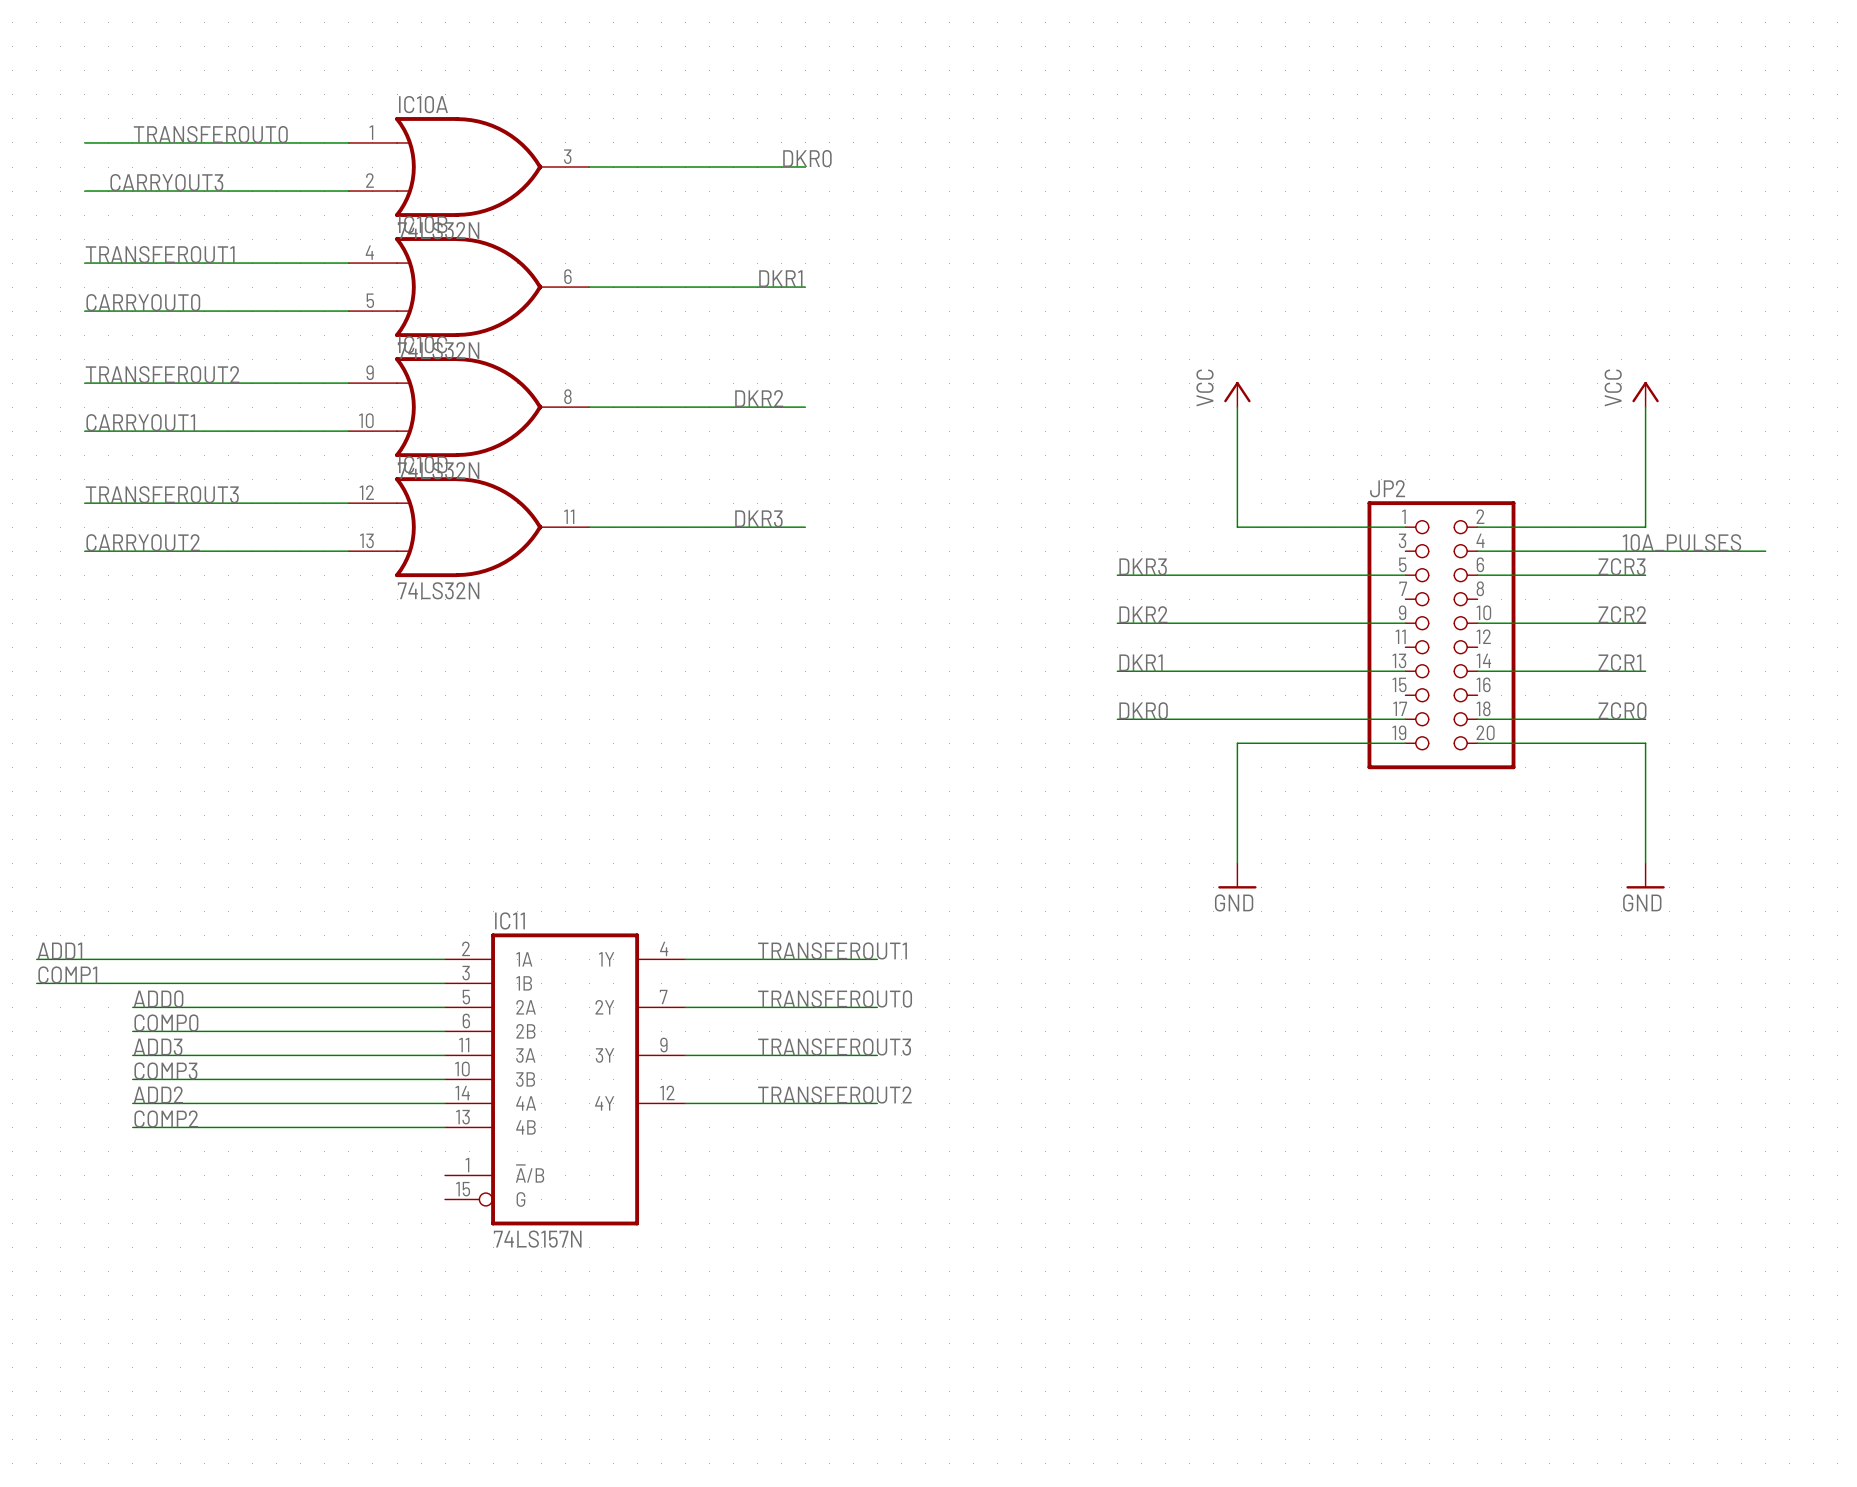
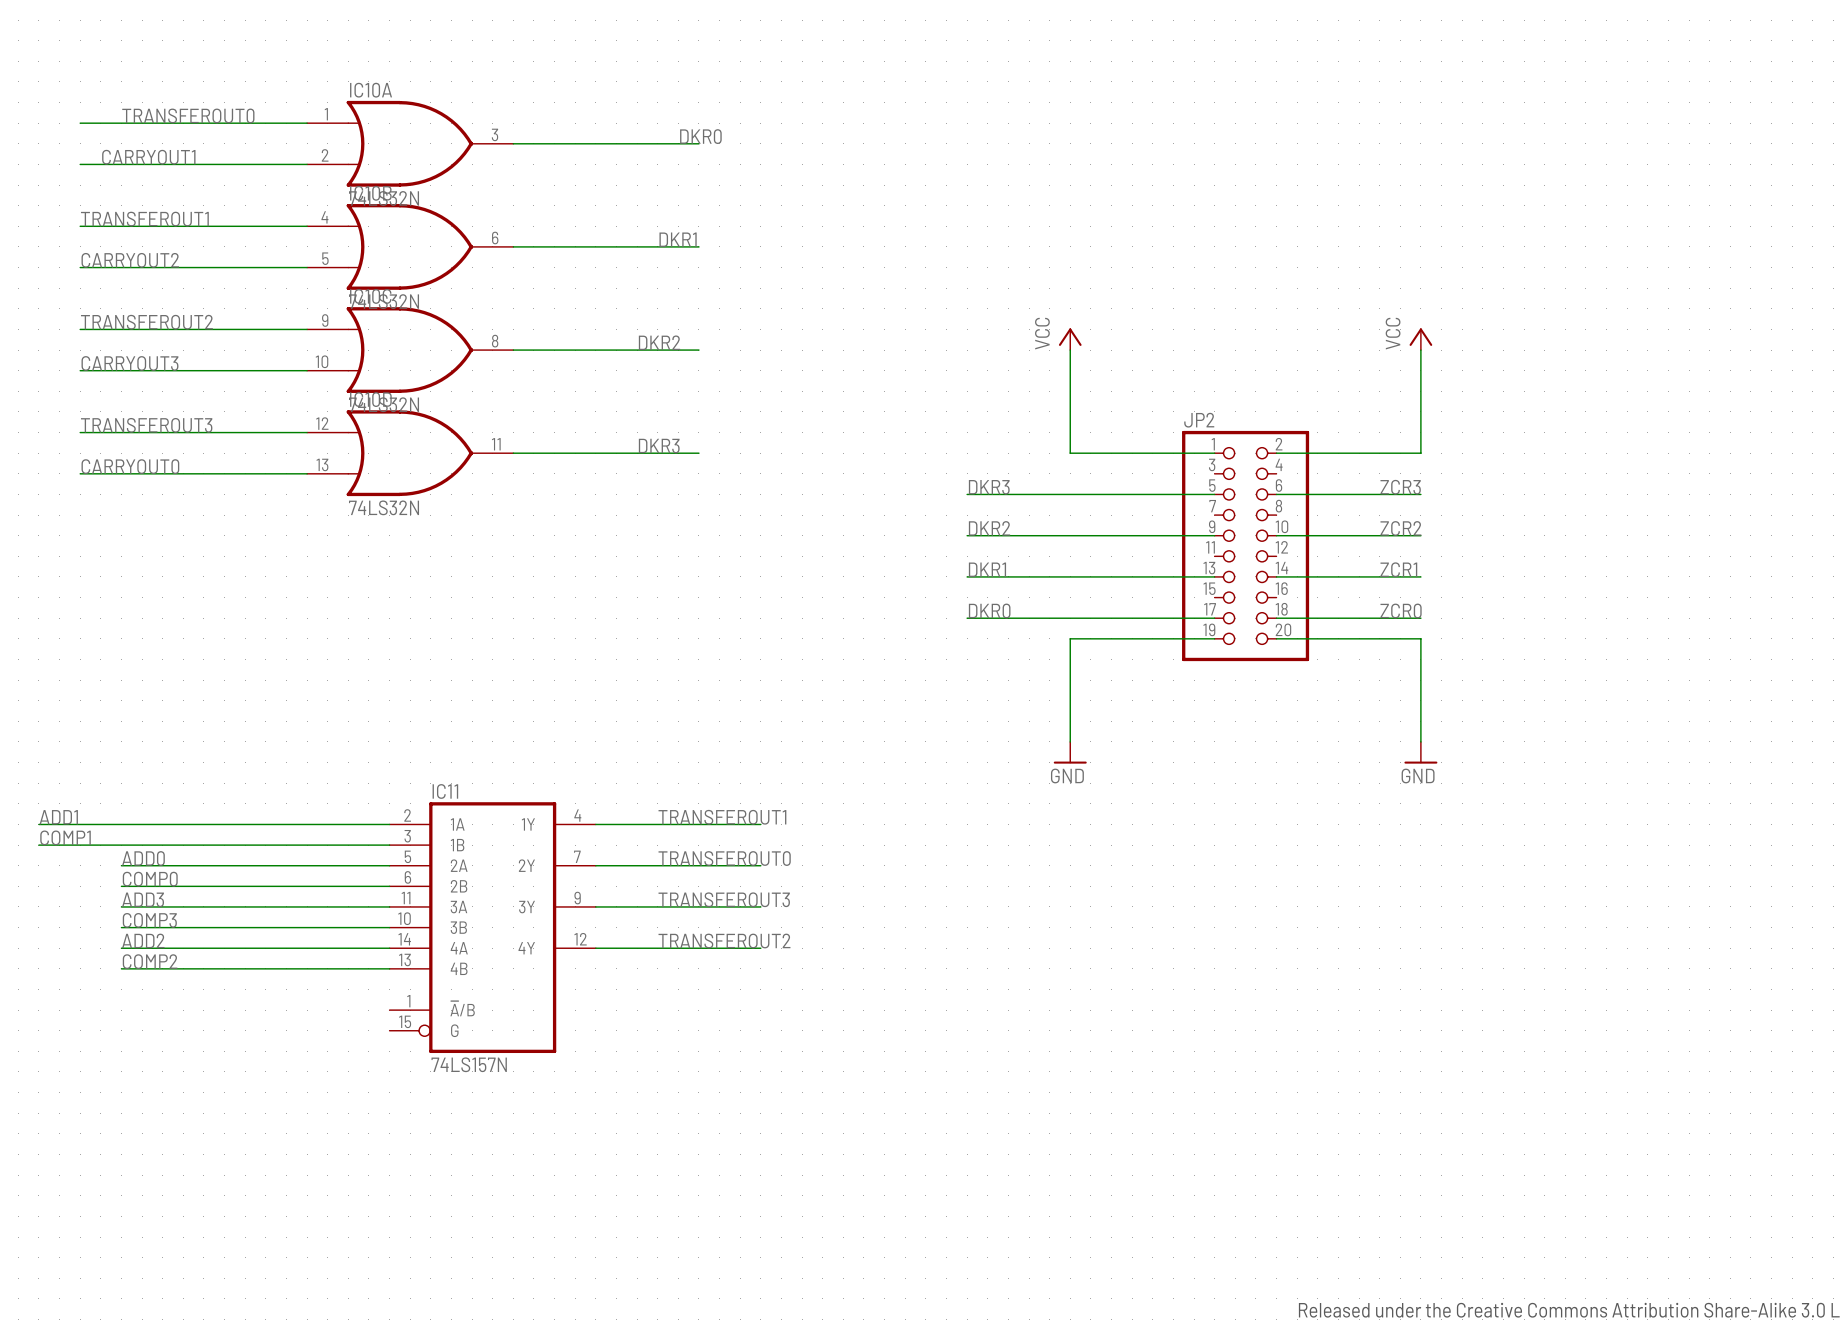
label: CARRYOUT3 (166, 182) -> CARRYOUT1 (148, 157)
label: CARRYOUT0 (143, 302) -> CARRYOUT2 (130, 260)
label: CARRYOUT1 (140, 422) -> CARRYOUT3 (129, 363)
label: CARRYOUT2 (143, 542) -> CARRYOUT0 (130, 466)
label: 10A_PULSES (1681, 542) -> none
wire: (1477, 551) (1765, 551) -> none

